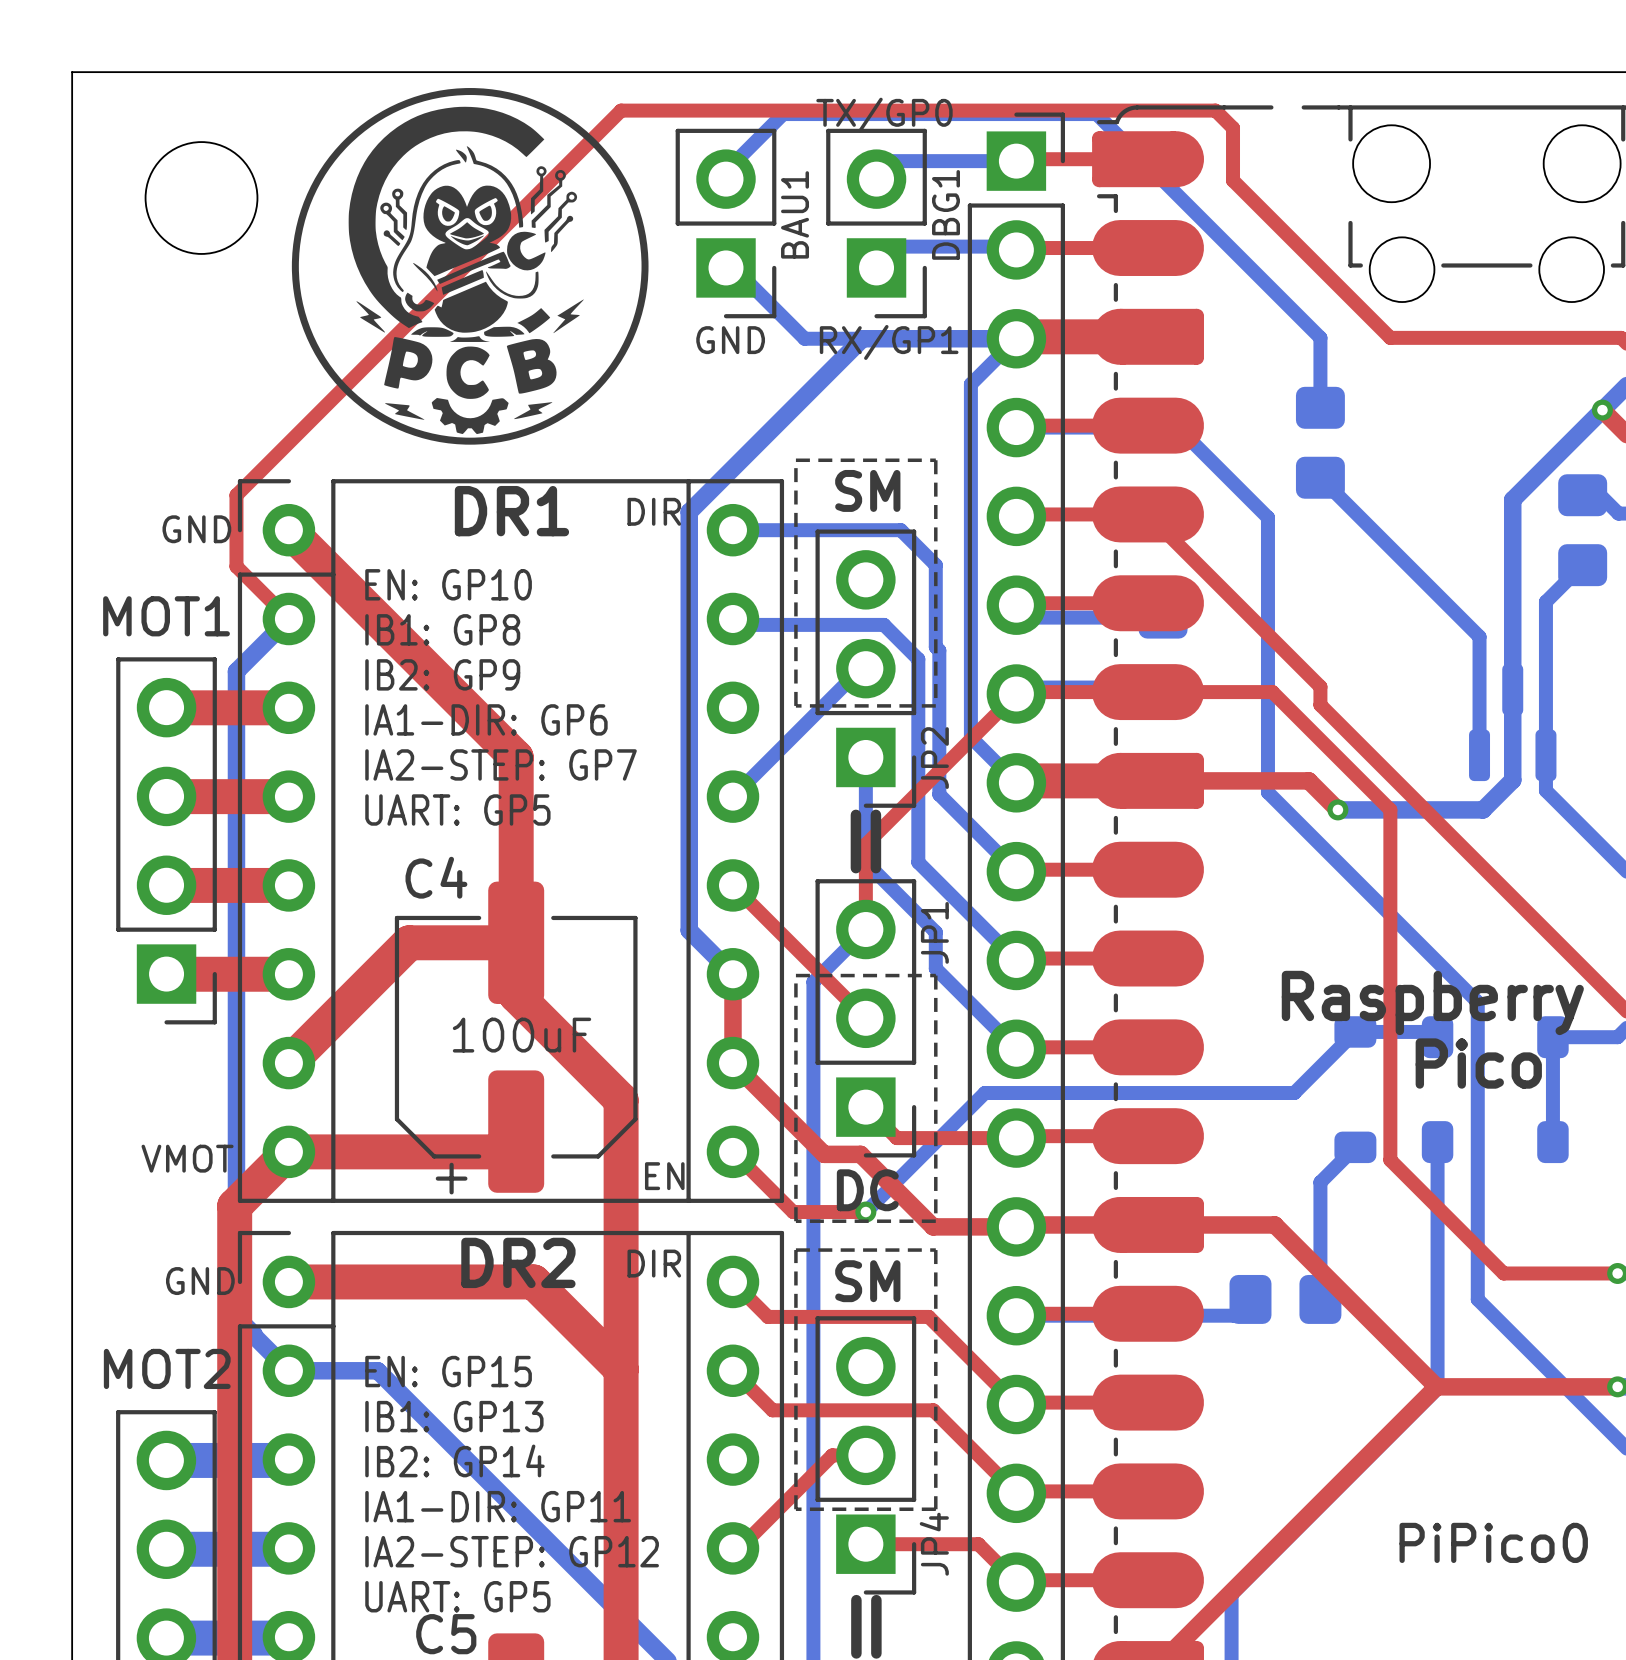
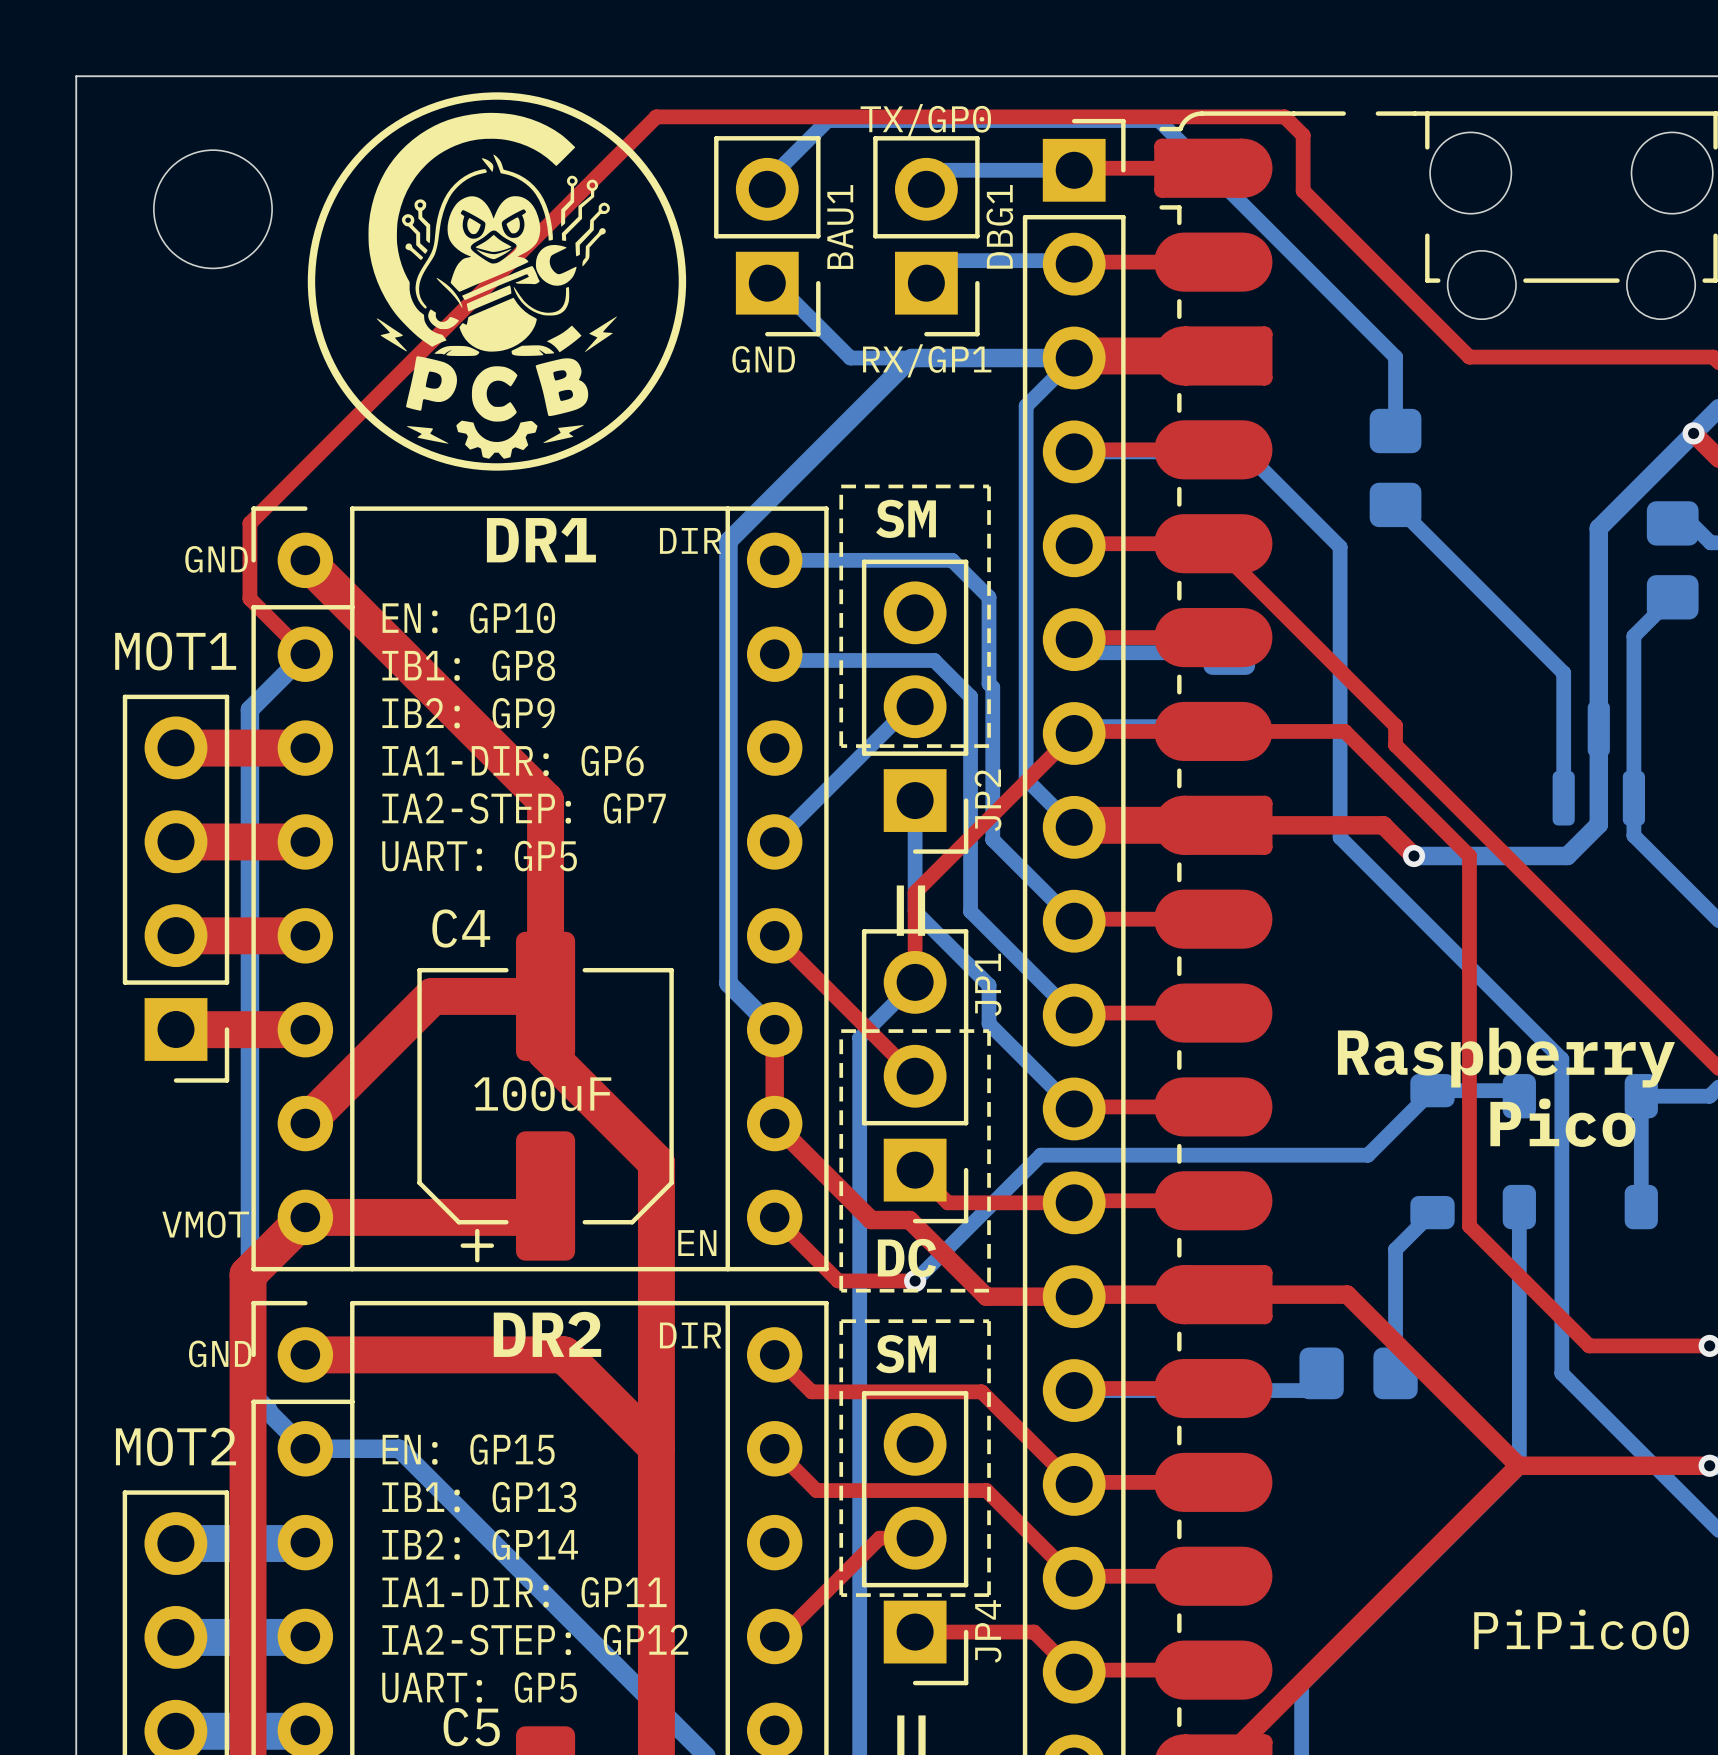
drawing shape: [291, 88, 649, 445] -> [307, 92, 687, 471]

